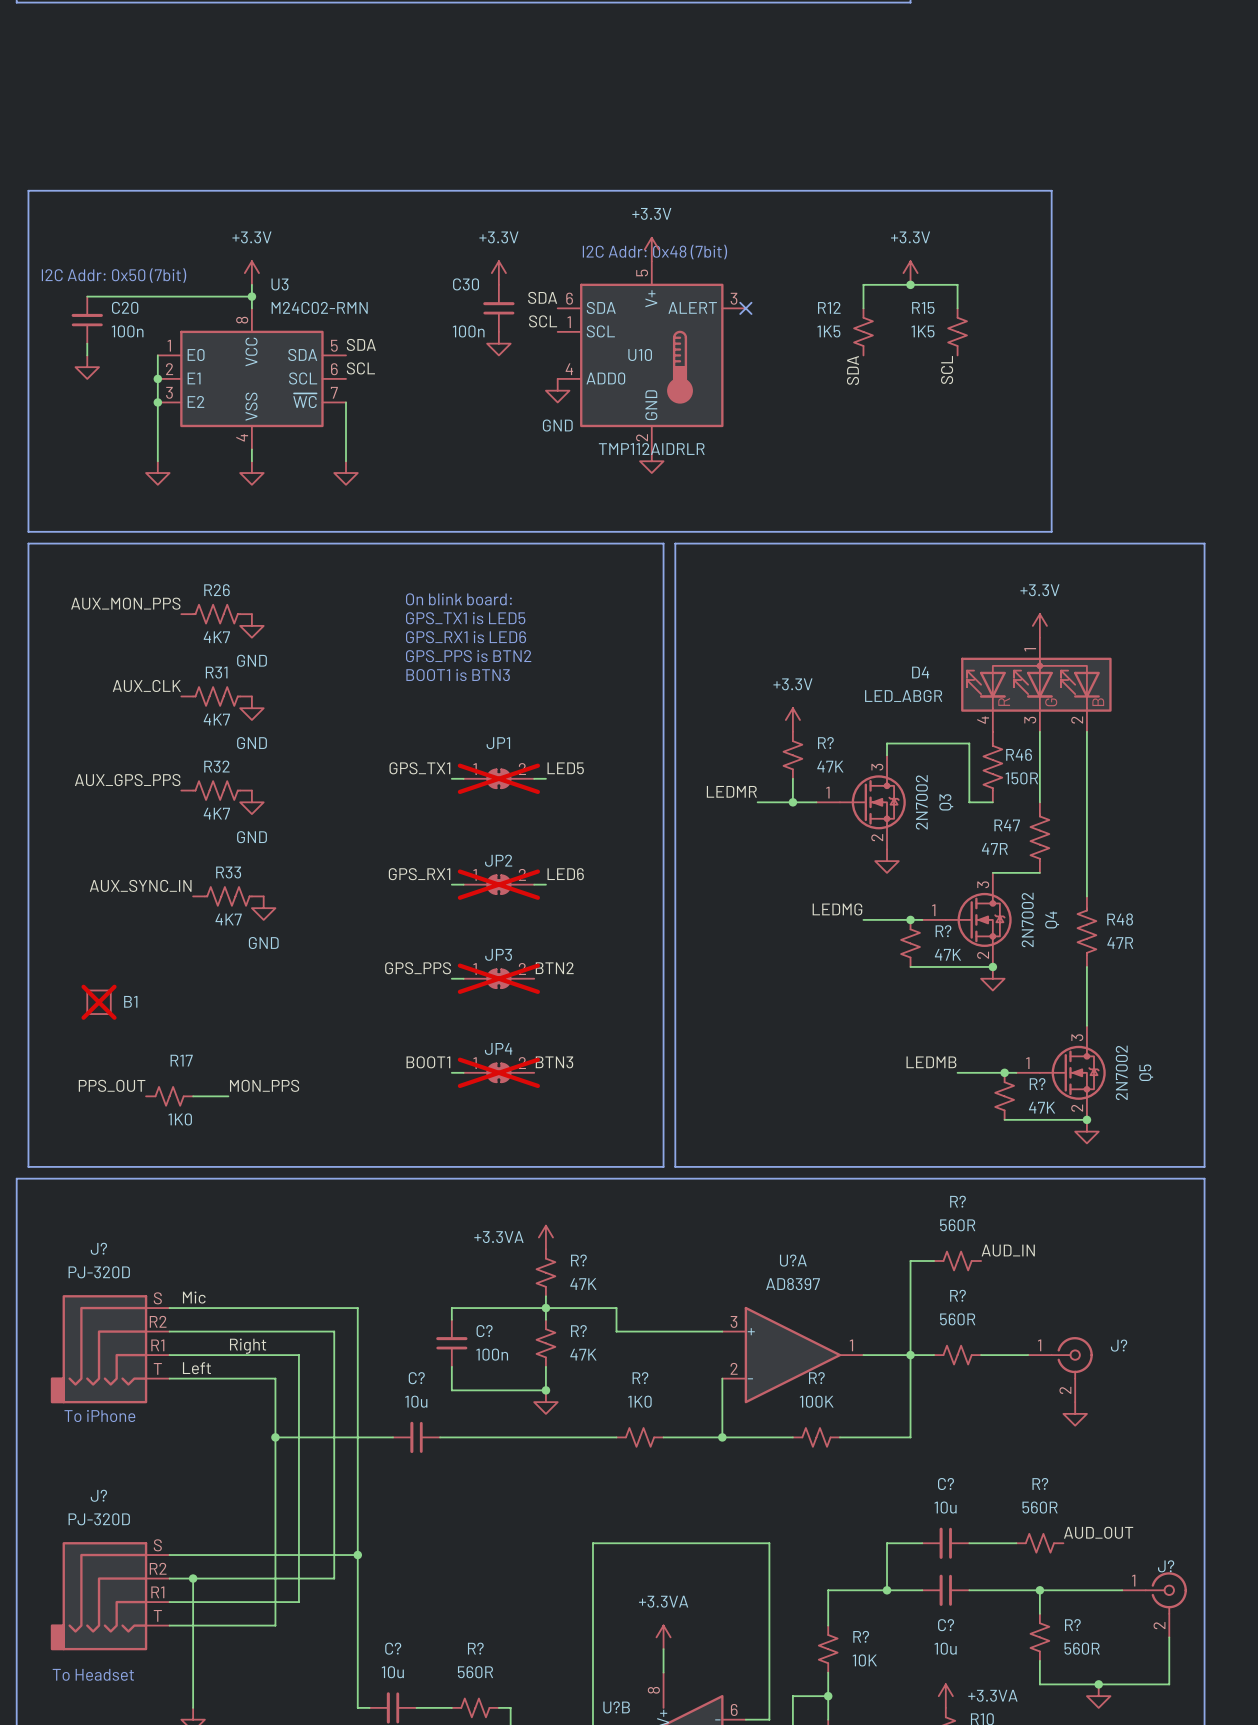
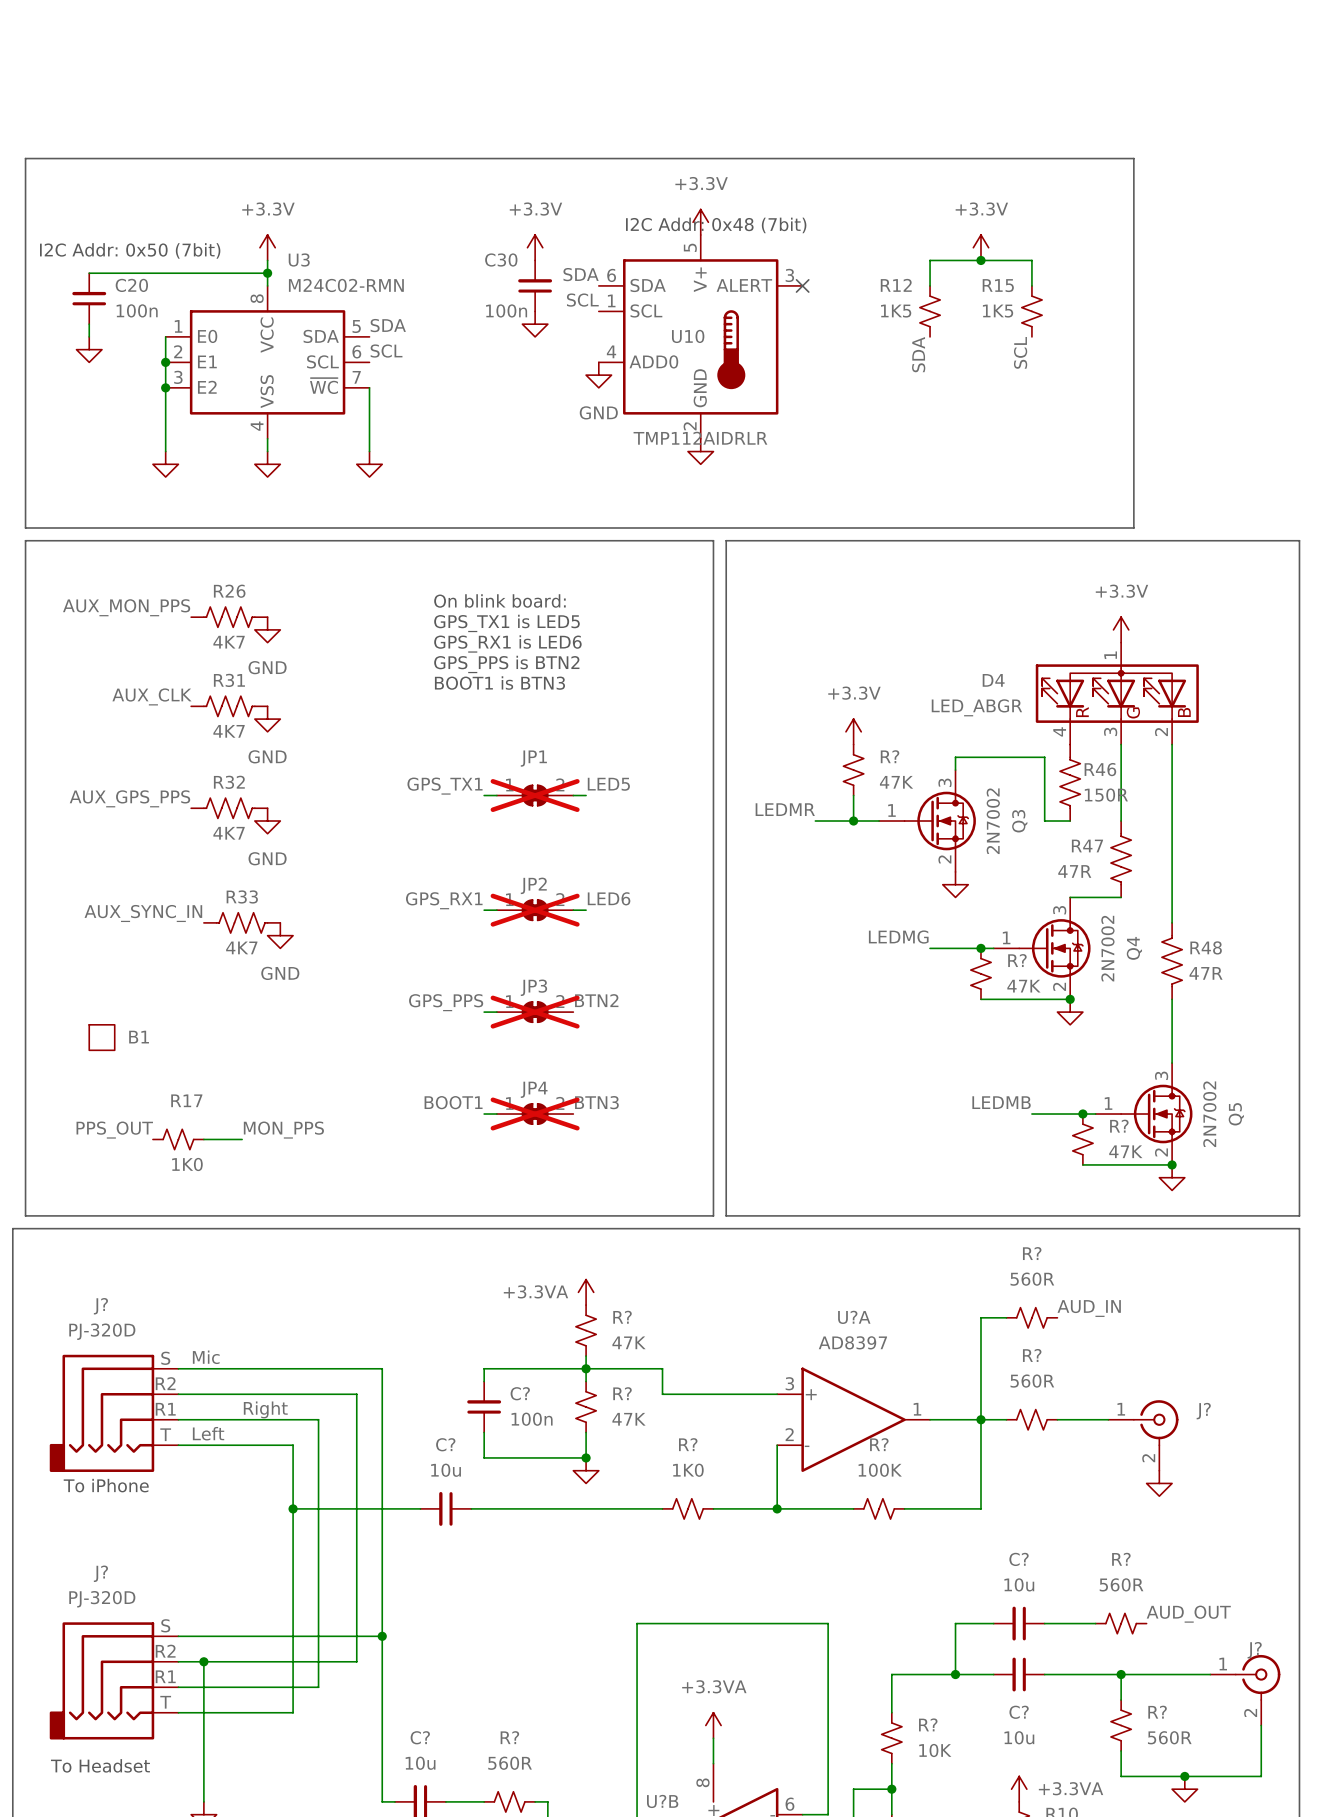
B1 do-not-place cross: (99, 1002) -> none

